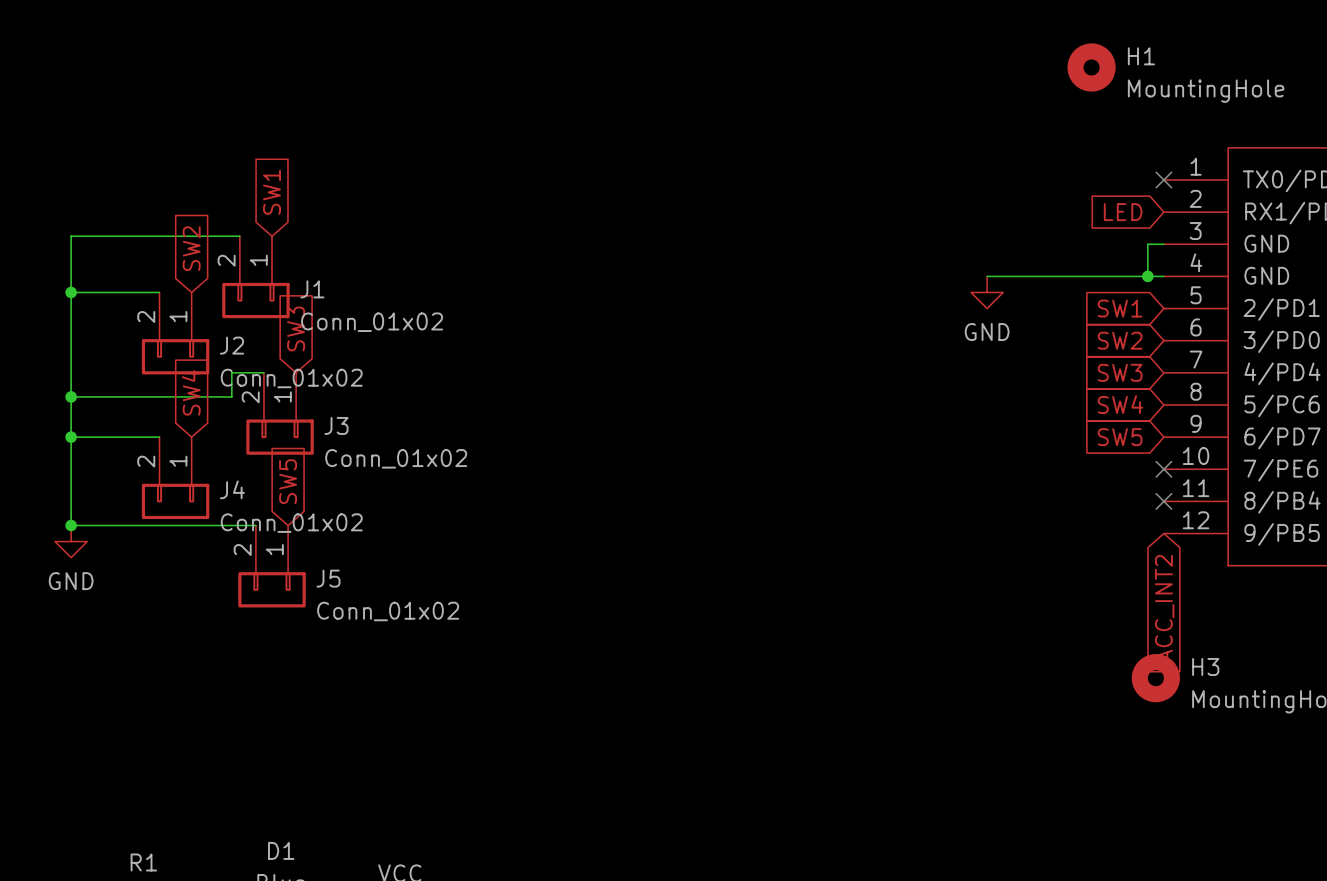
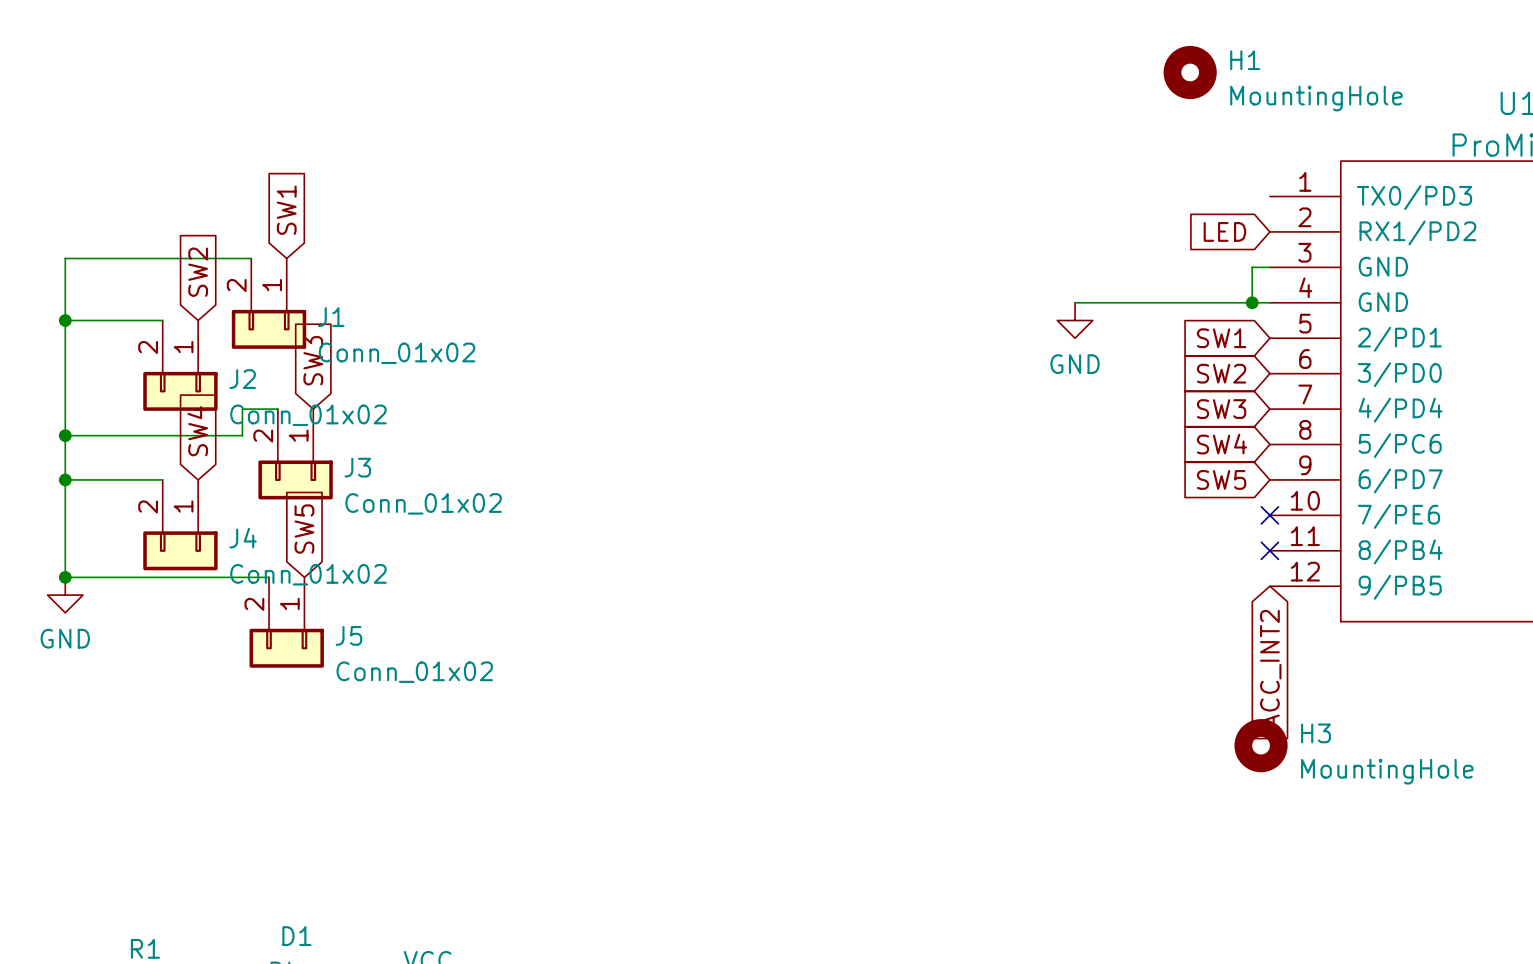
no-connect mark: (1163, 179) -> none

